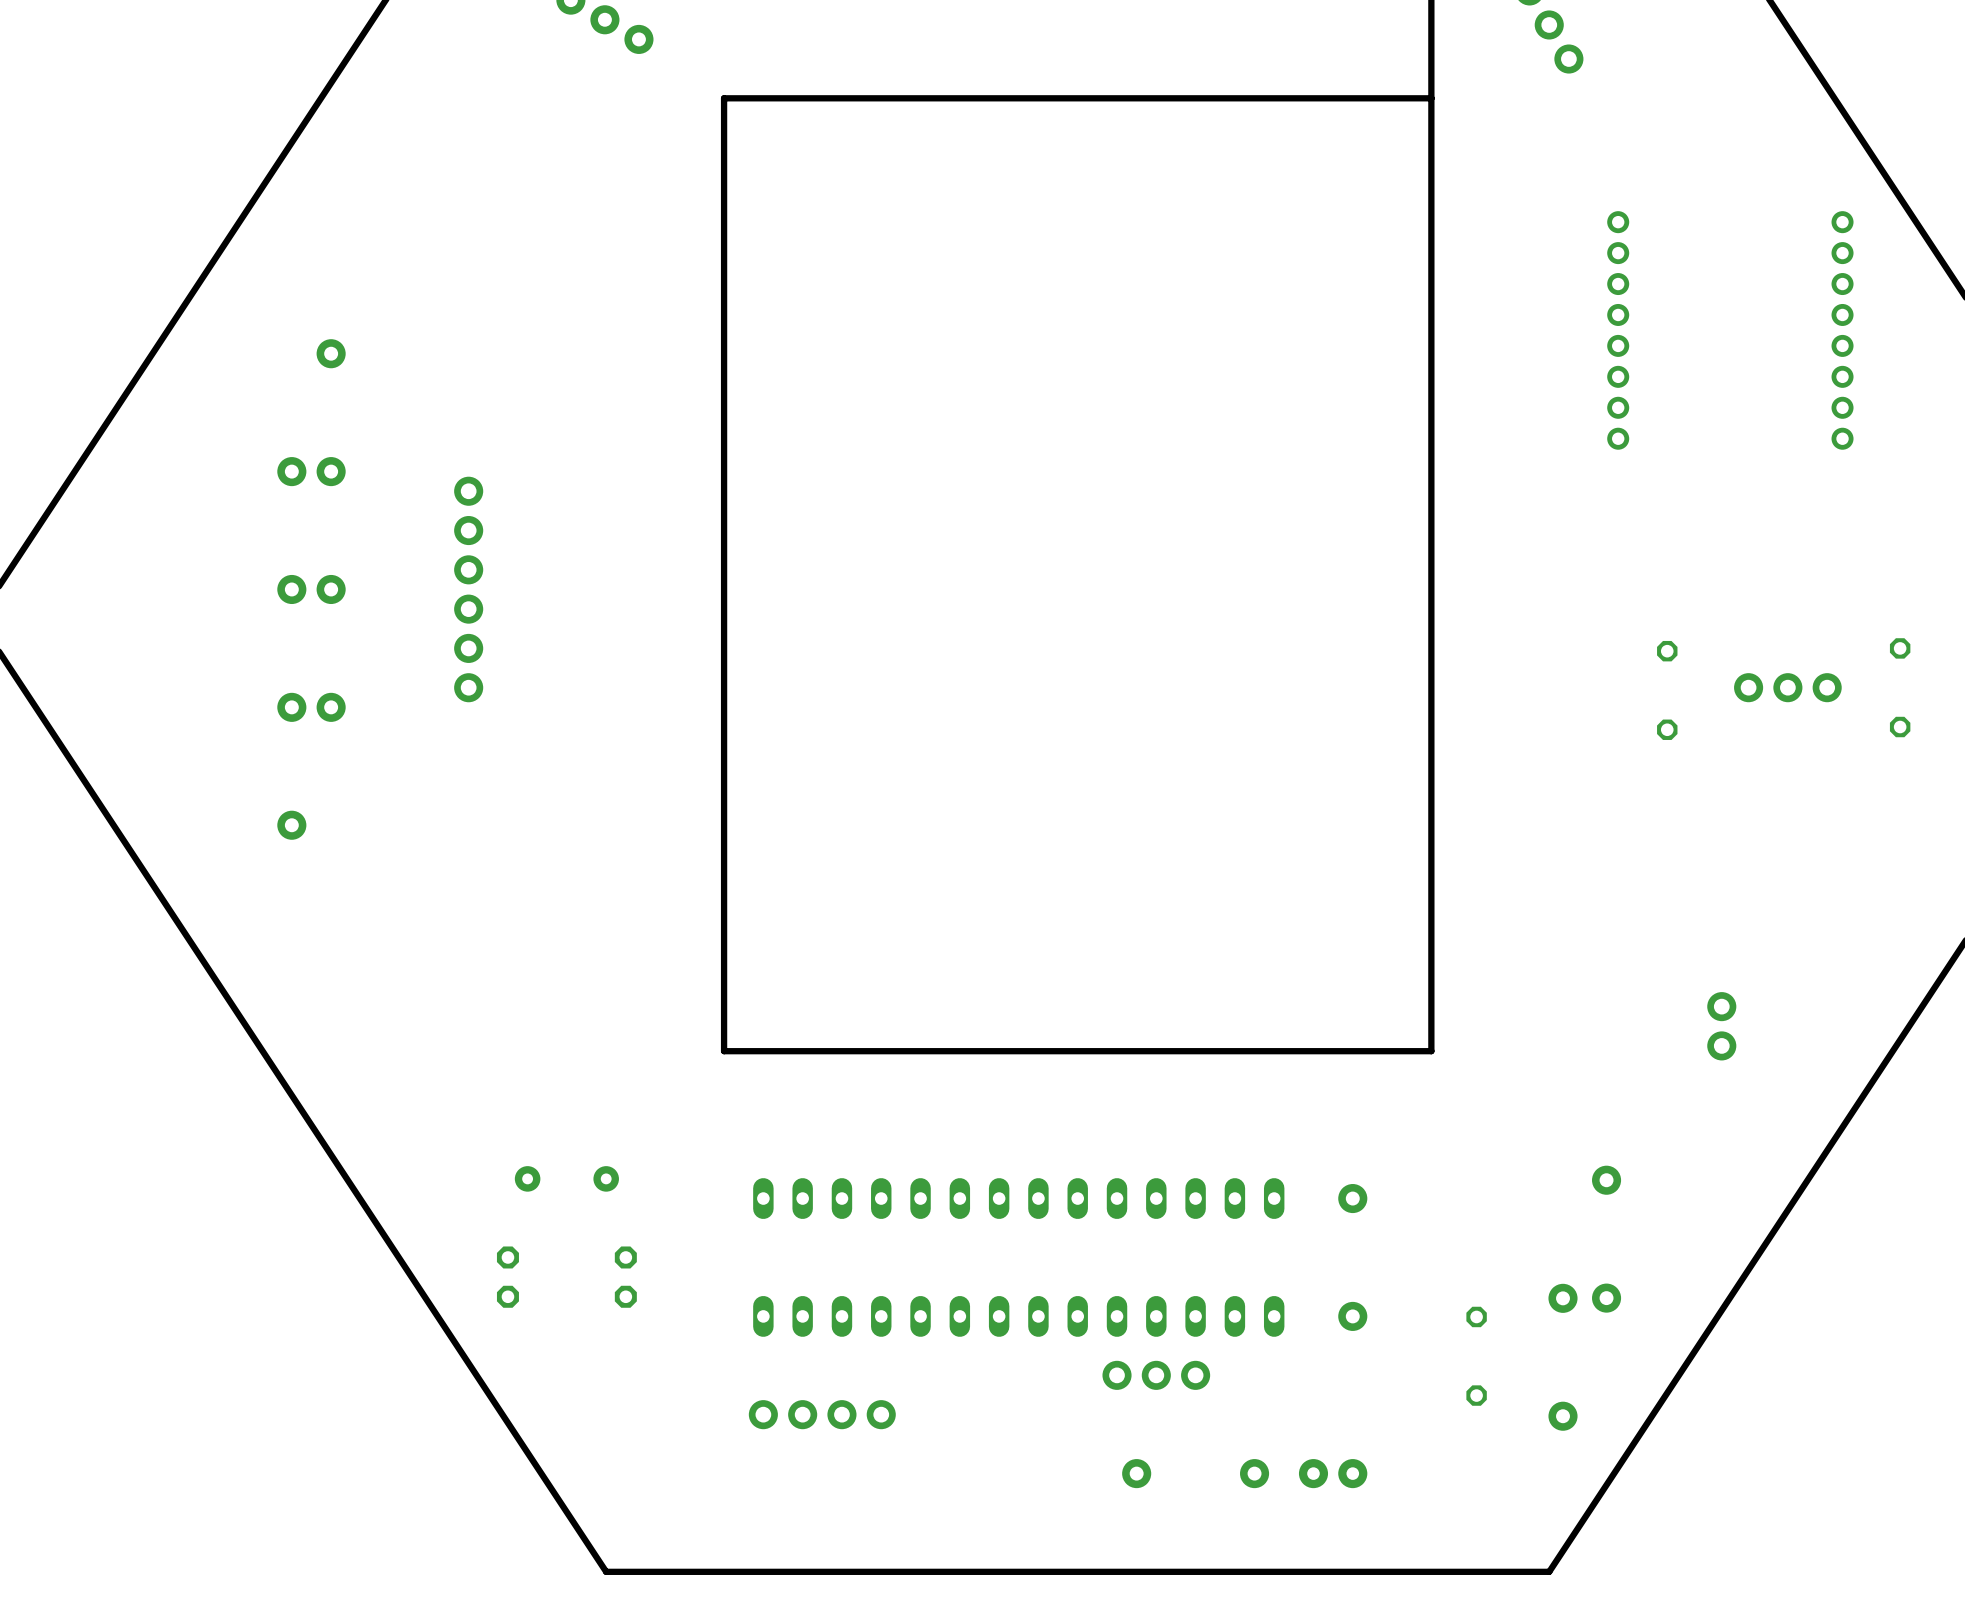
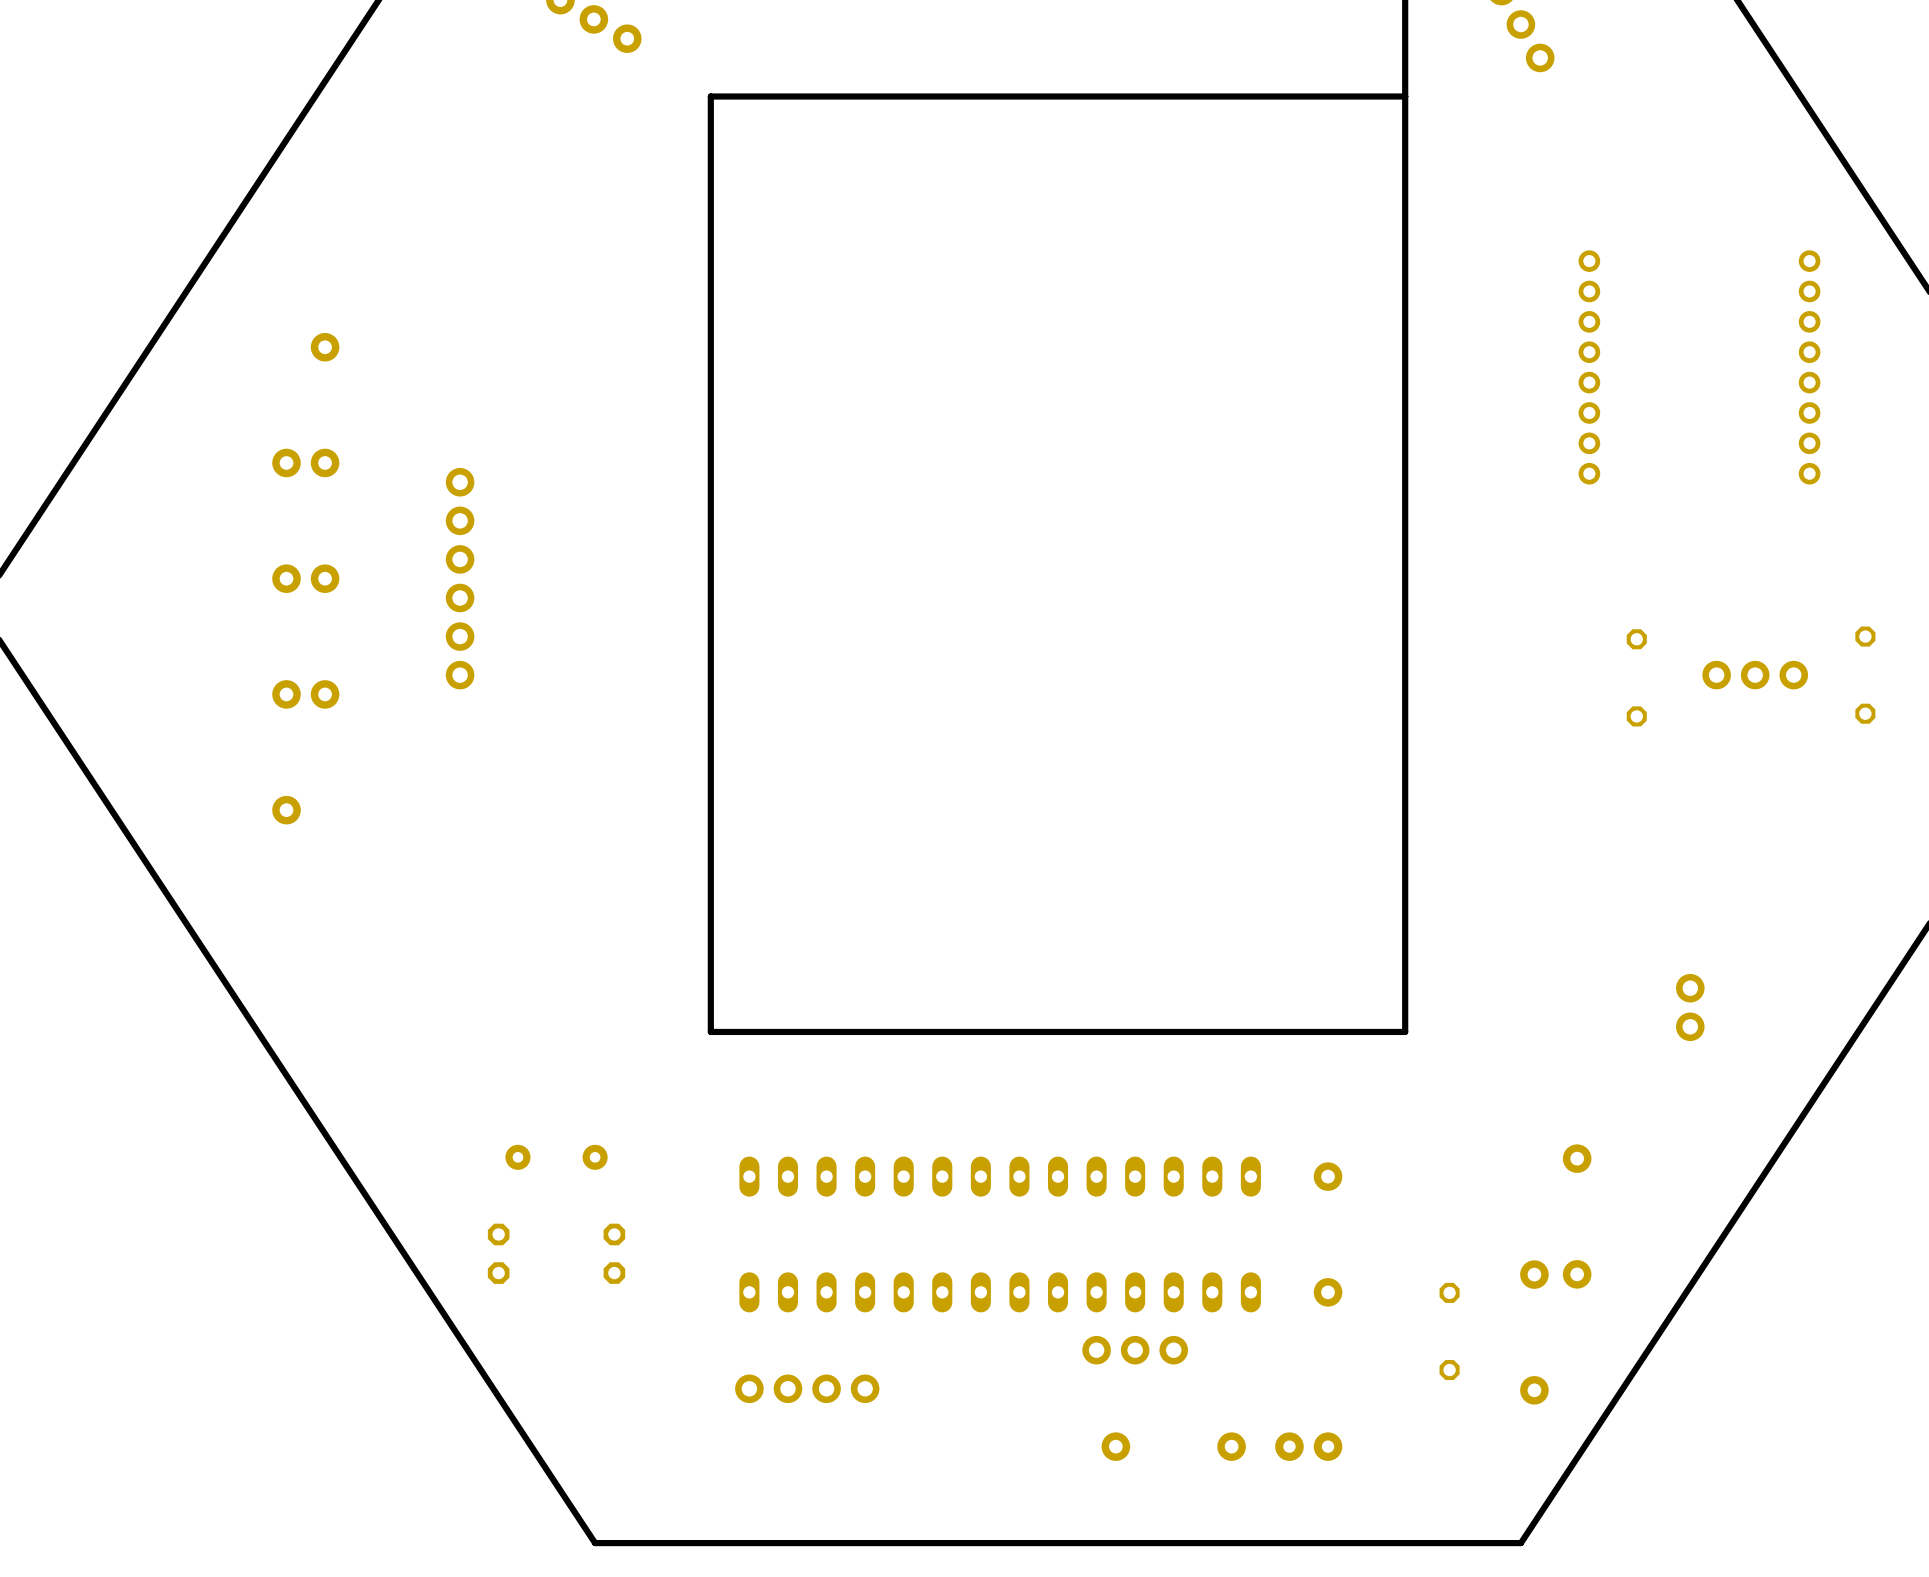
part position: (1618, 330) -> (1589, 367)
part position: (1842, 330) -> (1809, 367)

